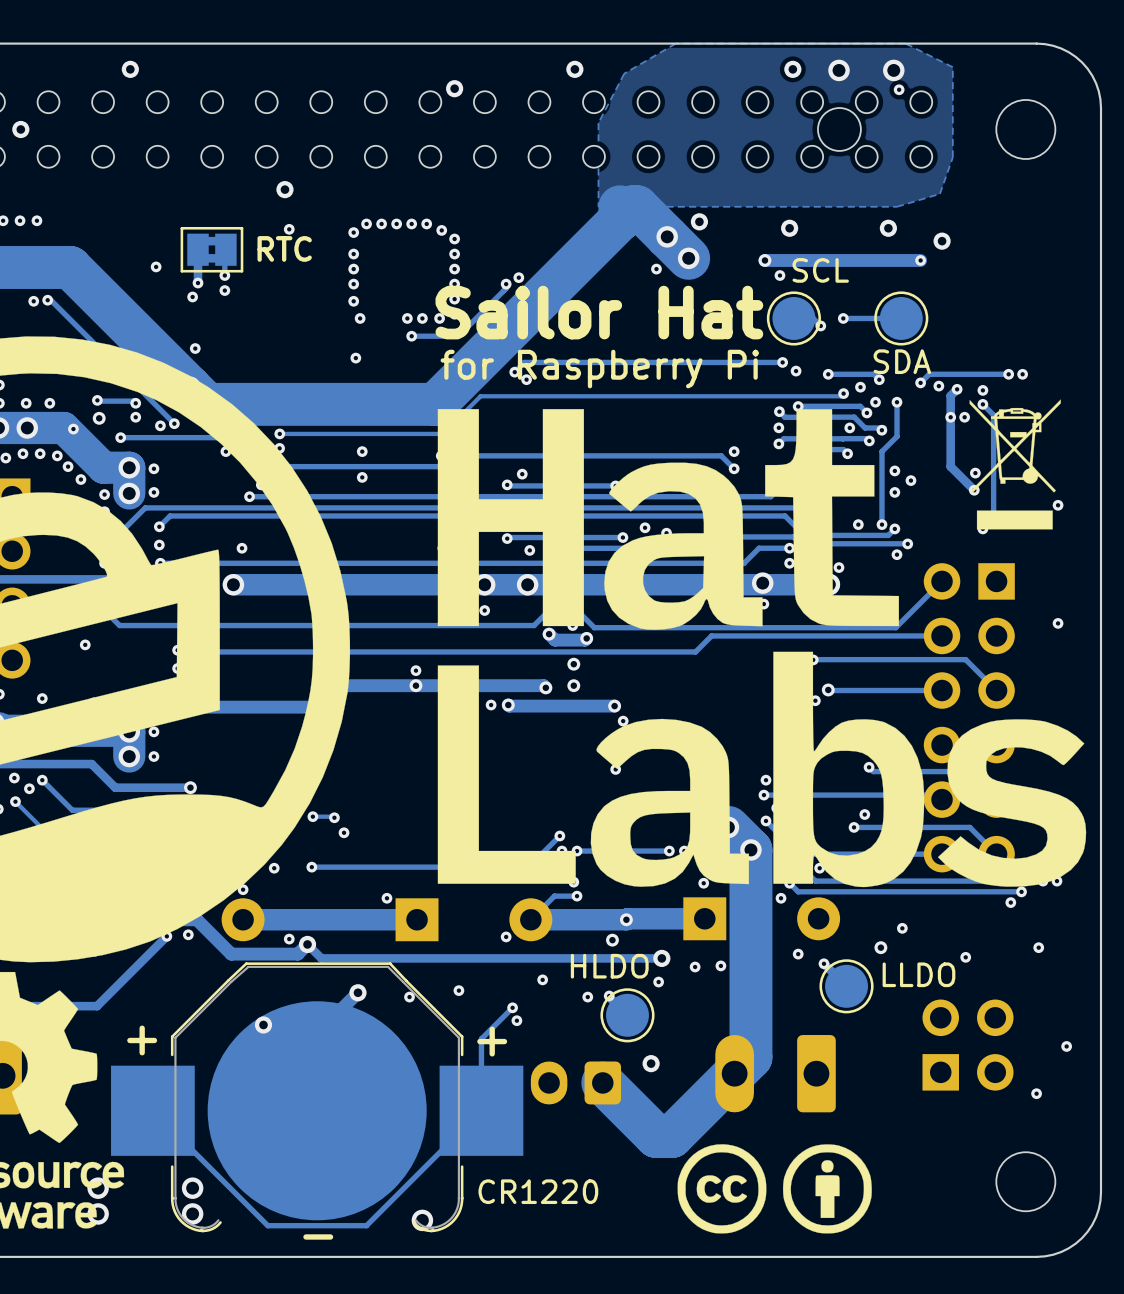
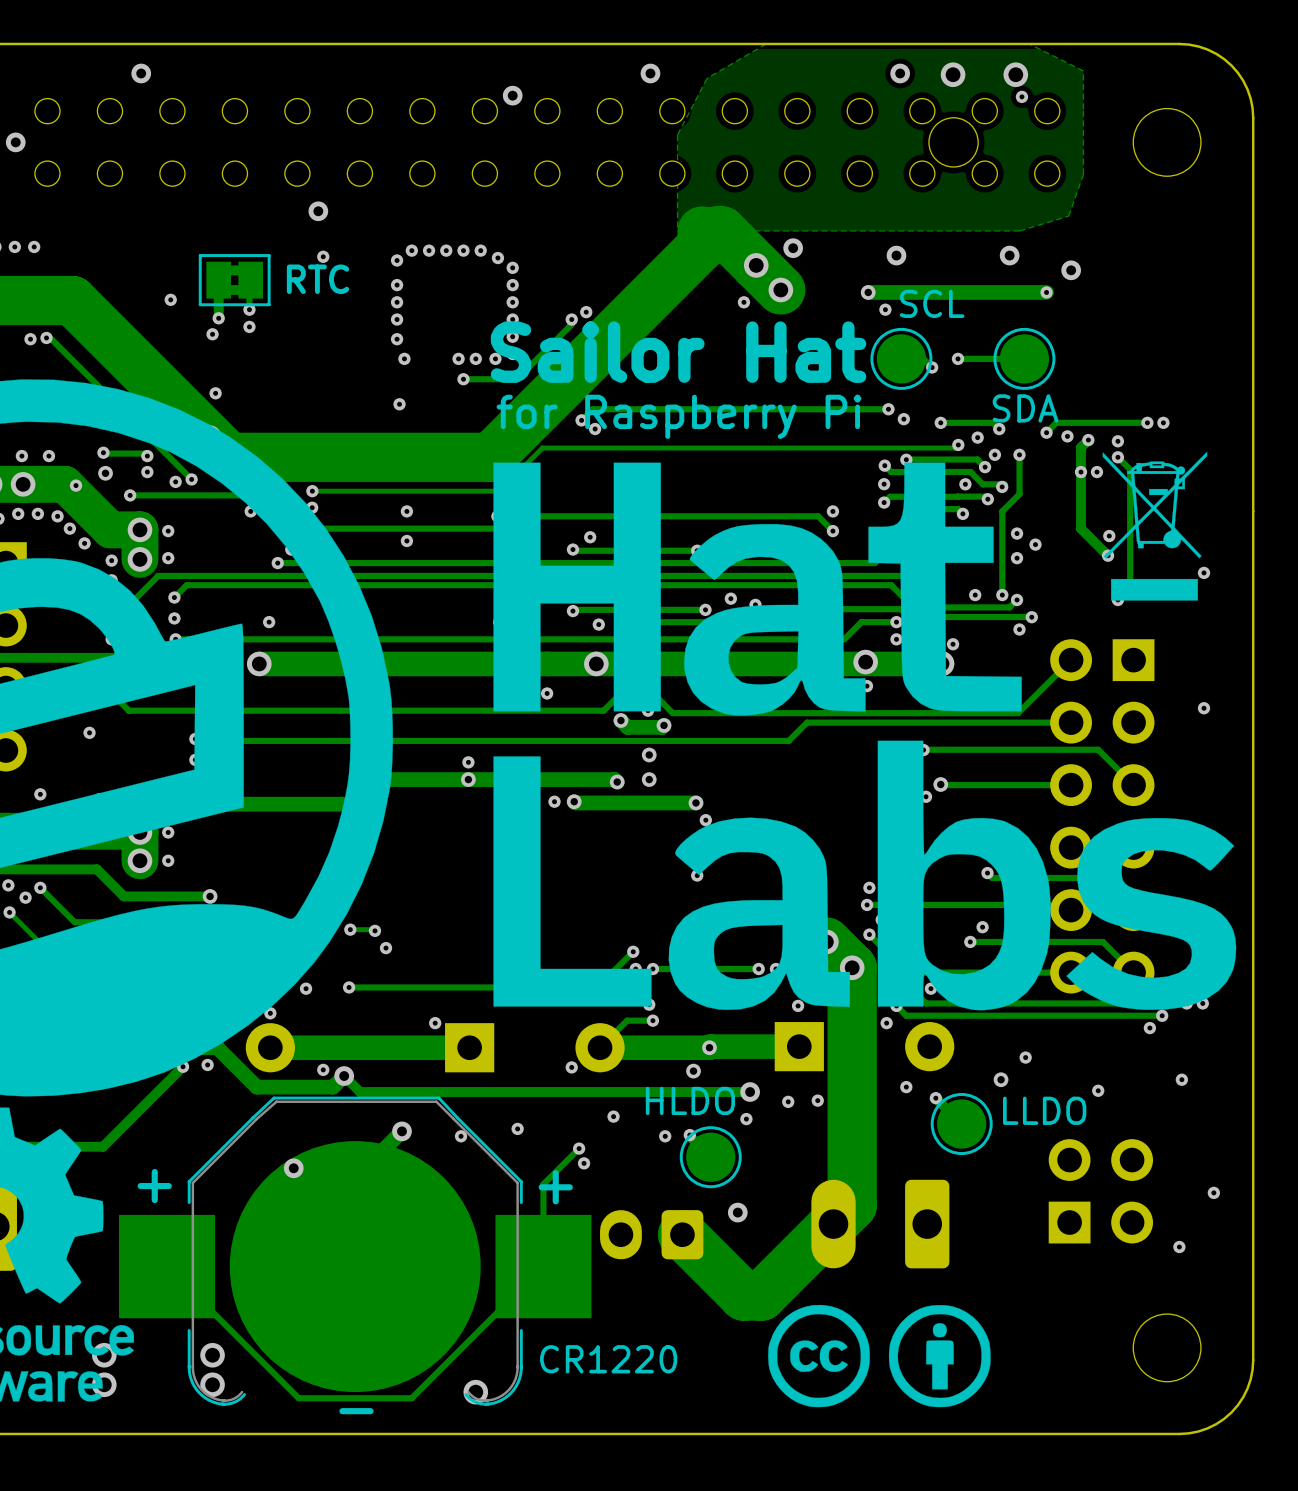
via: (484, 584) -> none

